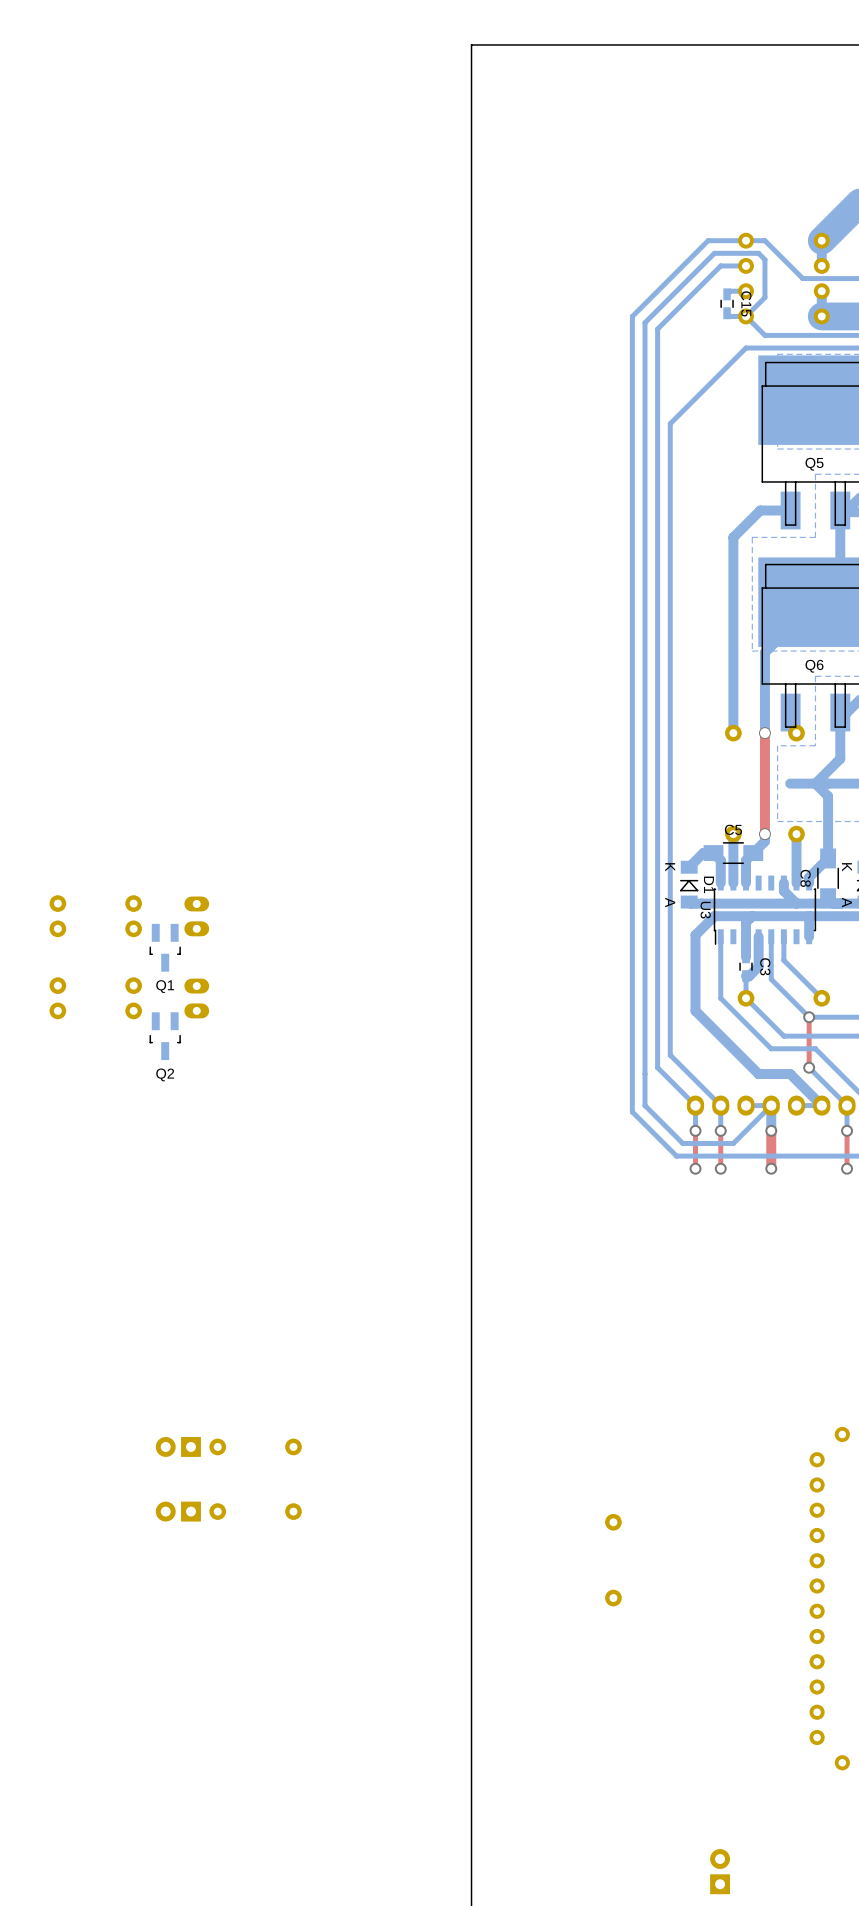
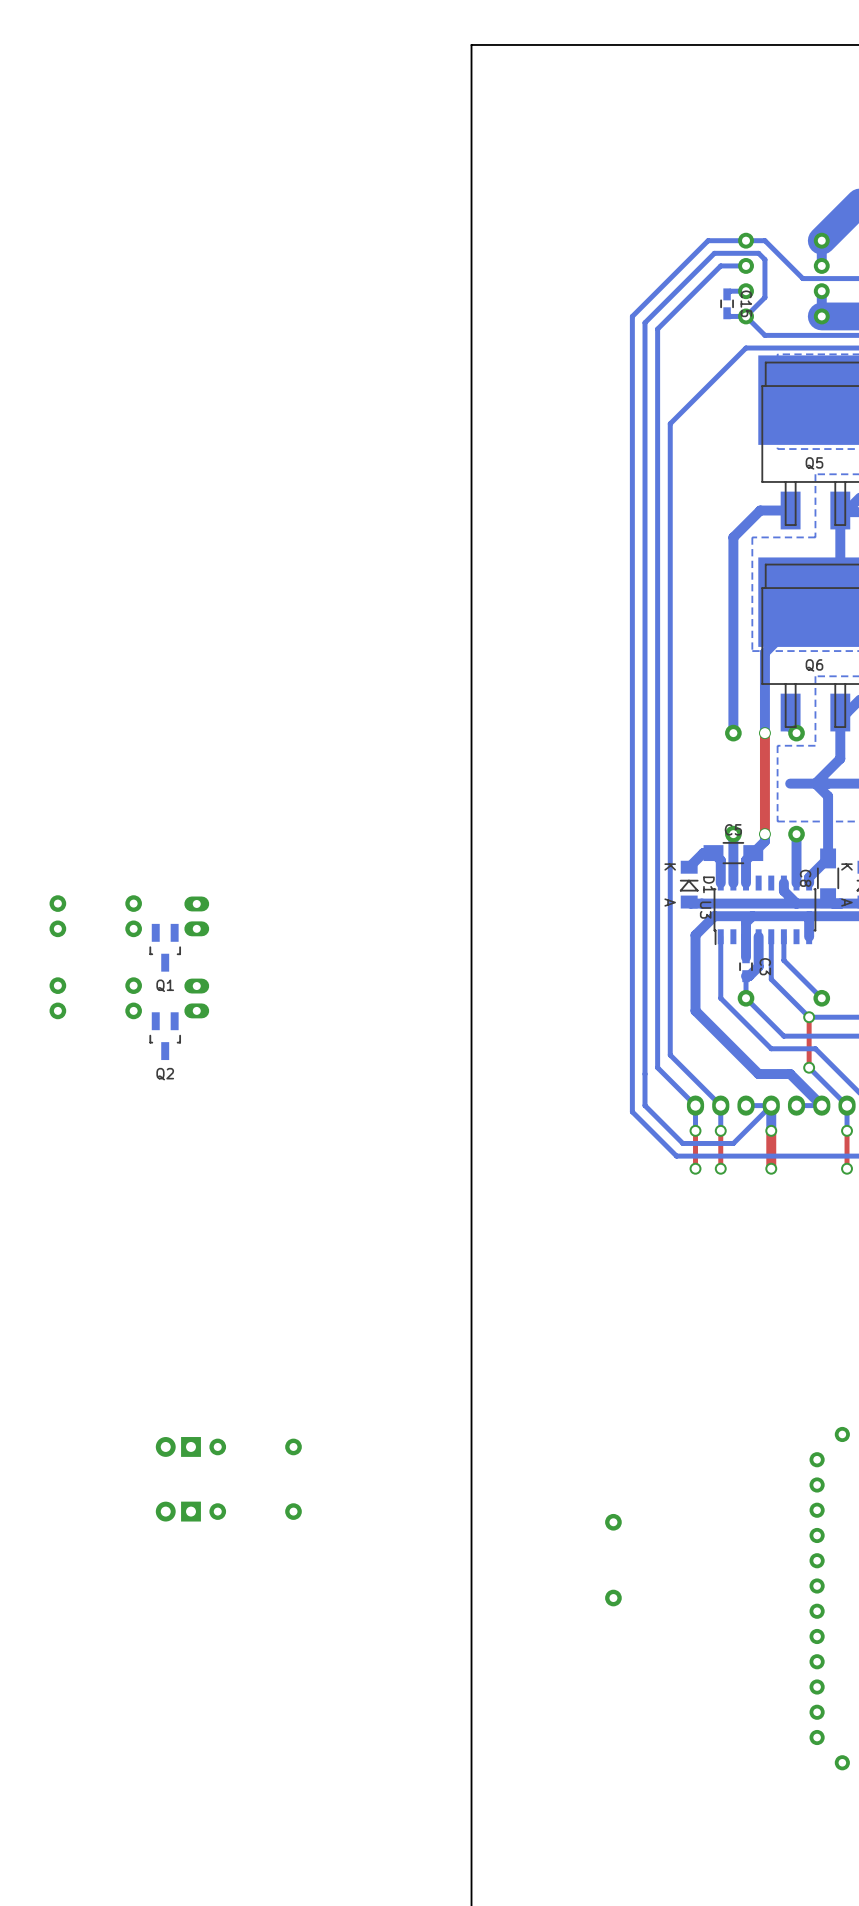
part: (720, 1871) -> none

